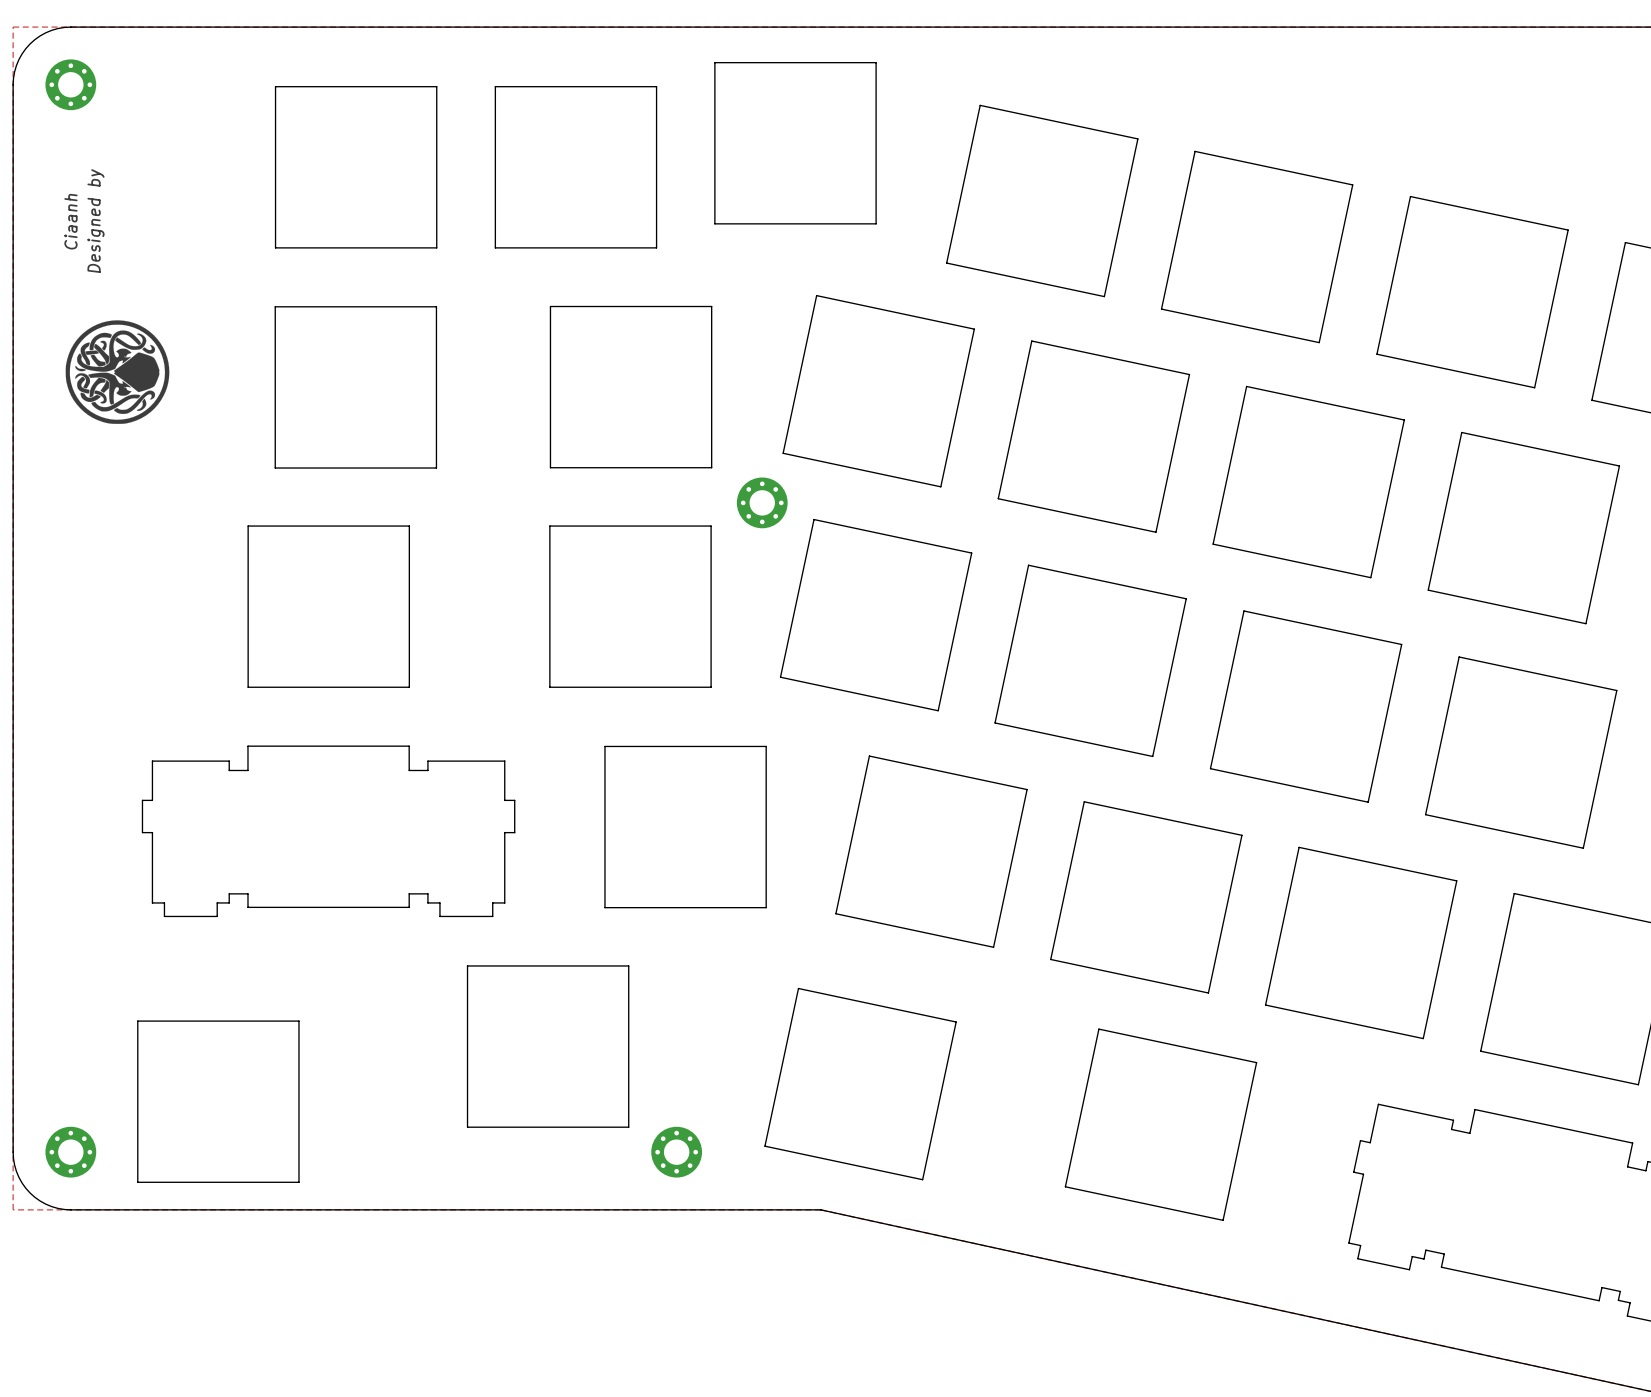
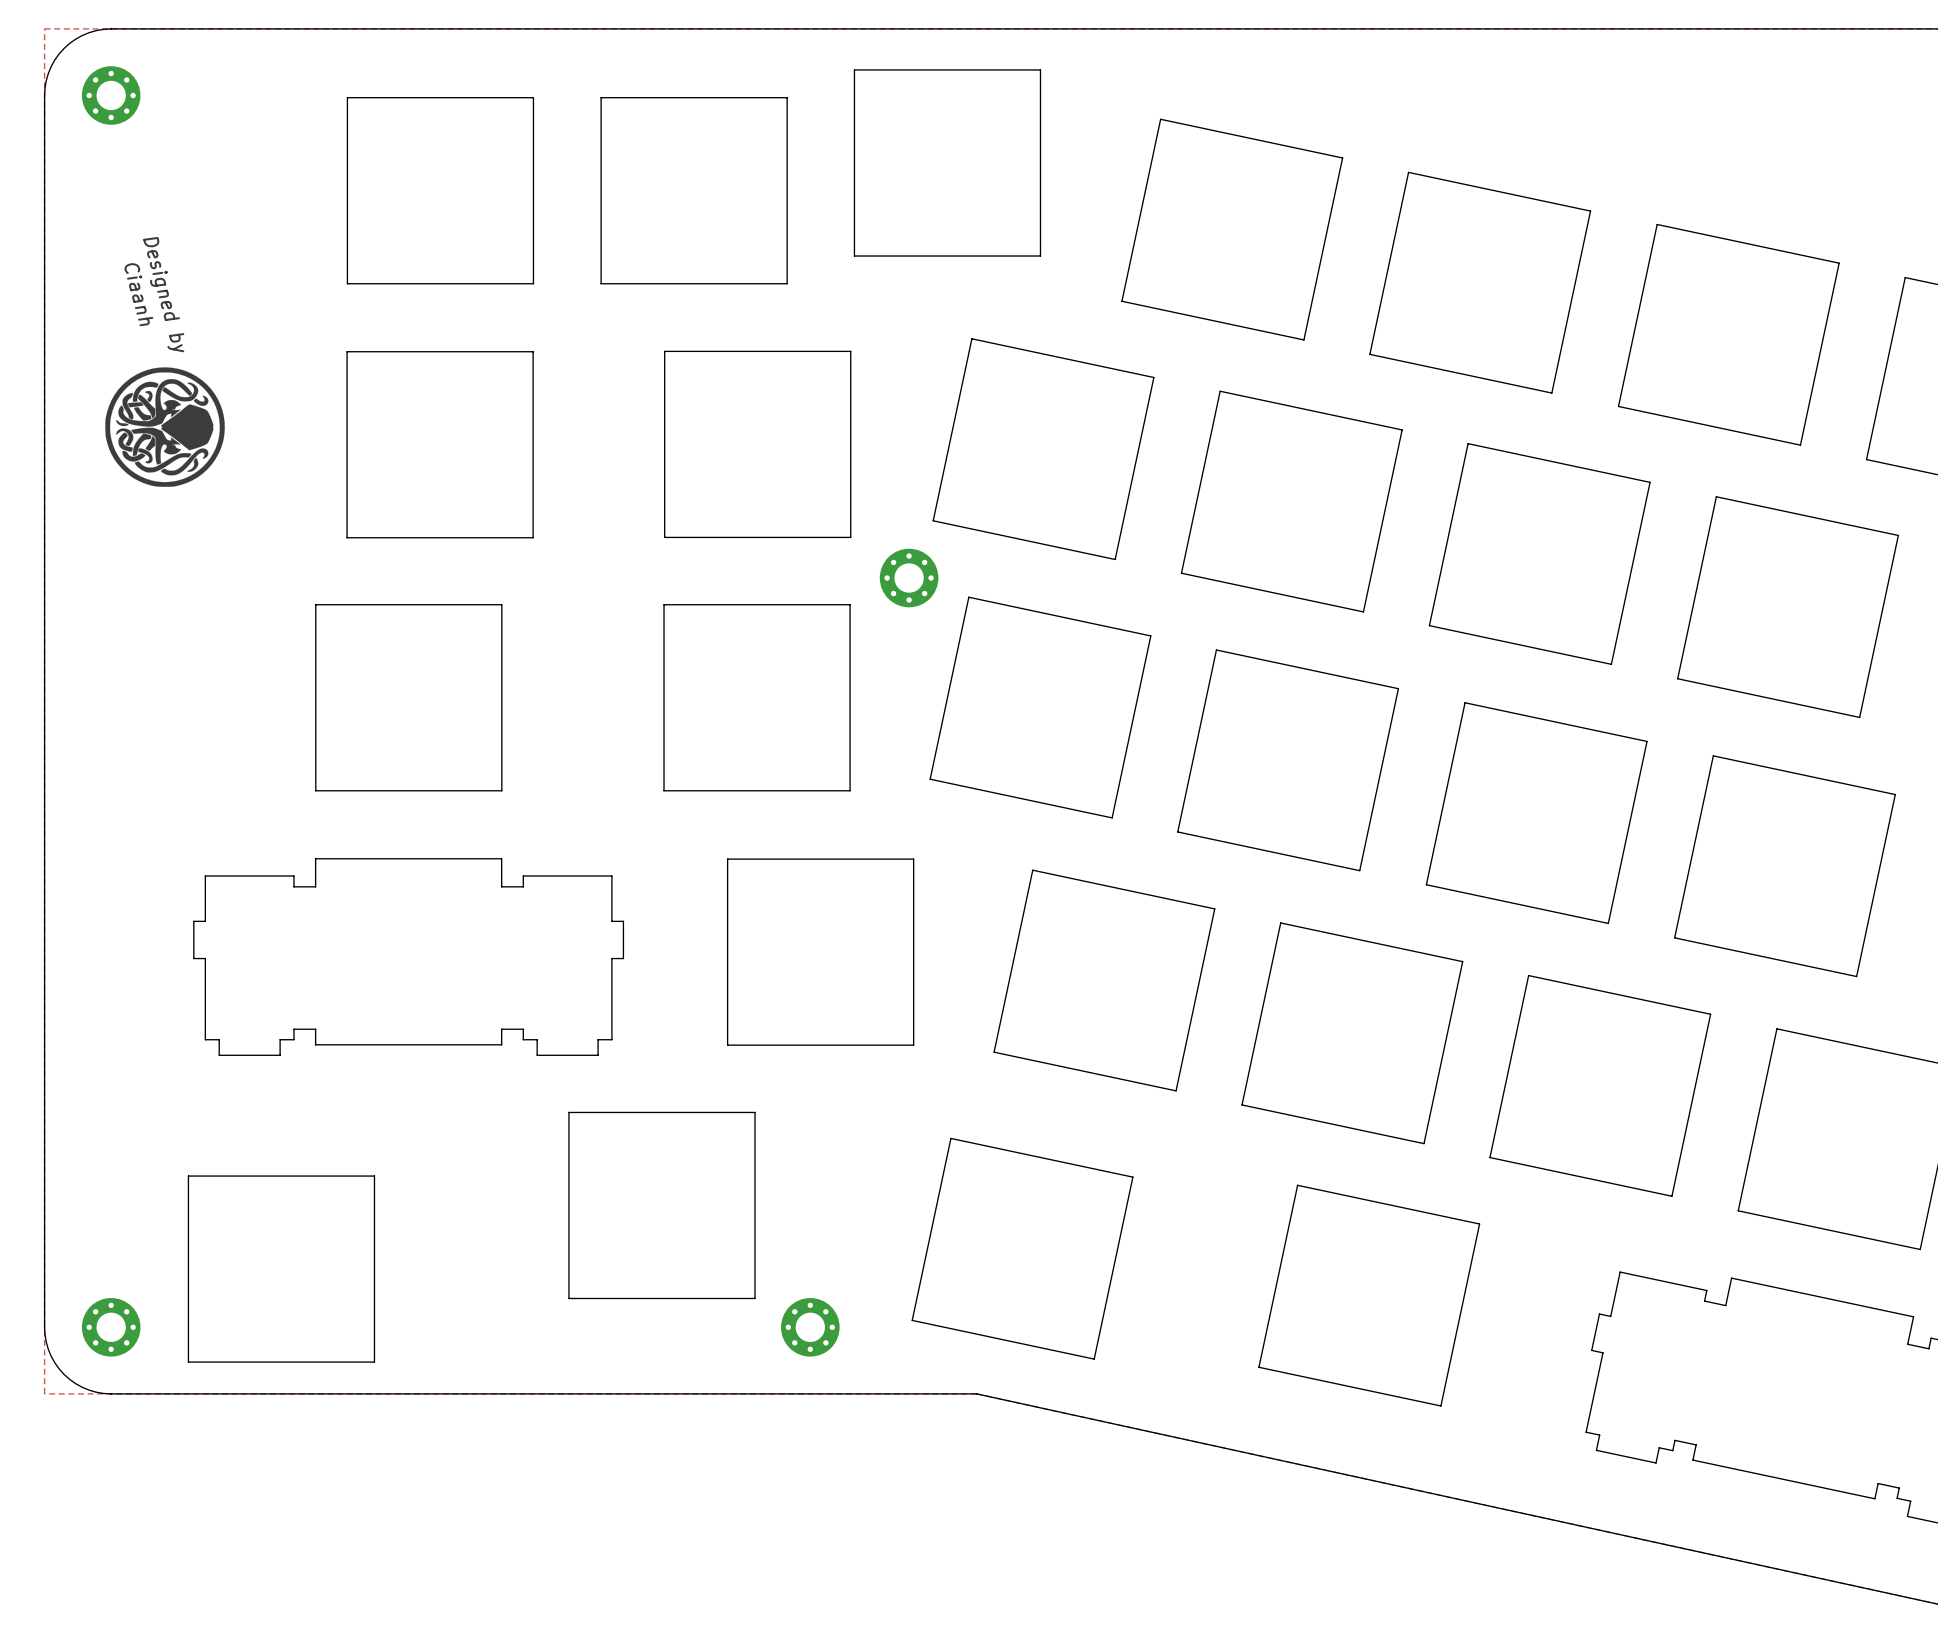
drawing shape: [64, 169, 170, 424] -> [105, 236, 225, 487]

